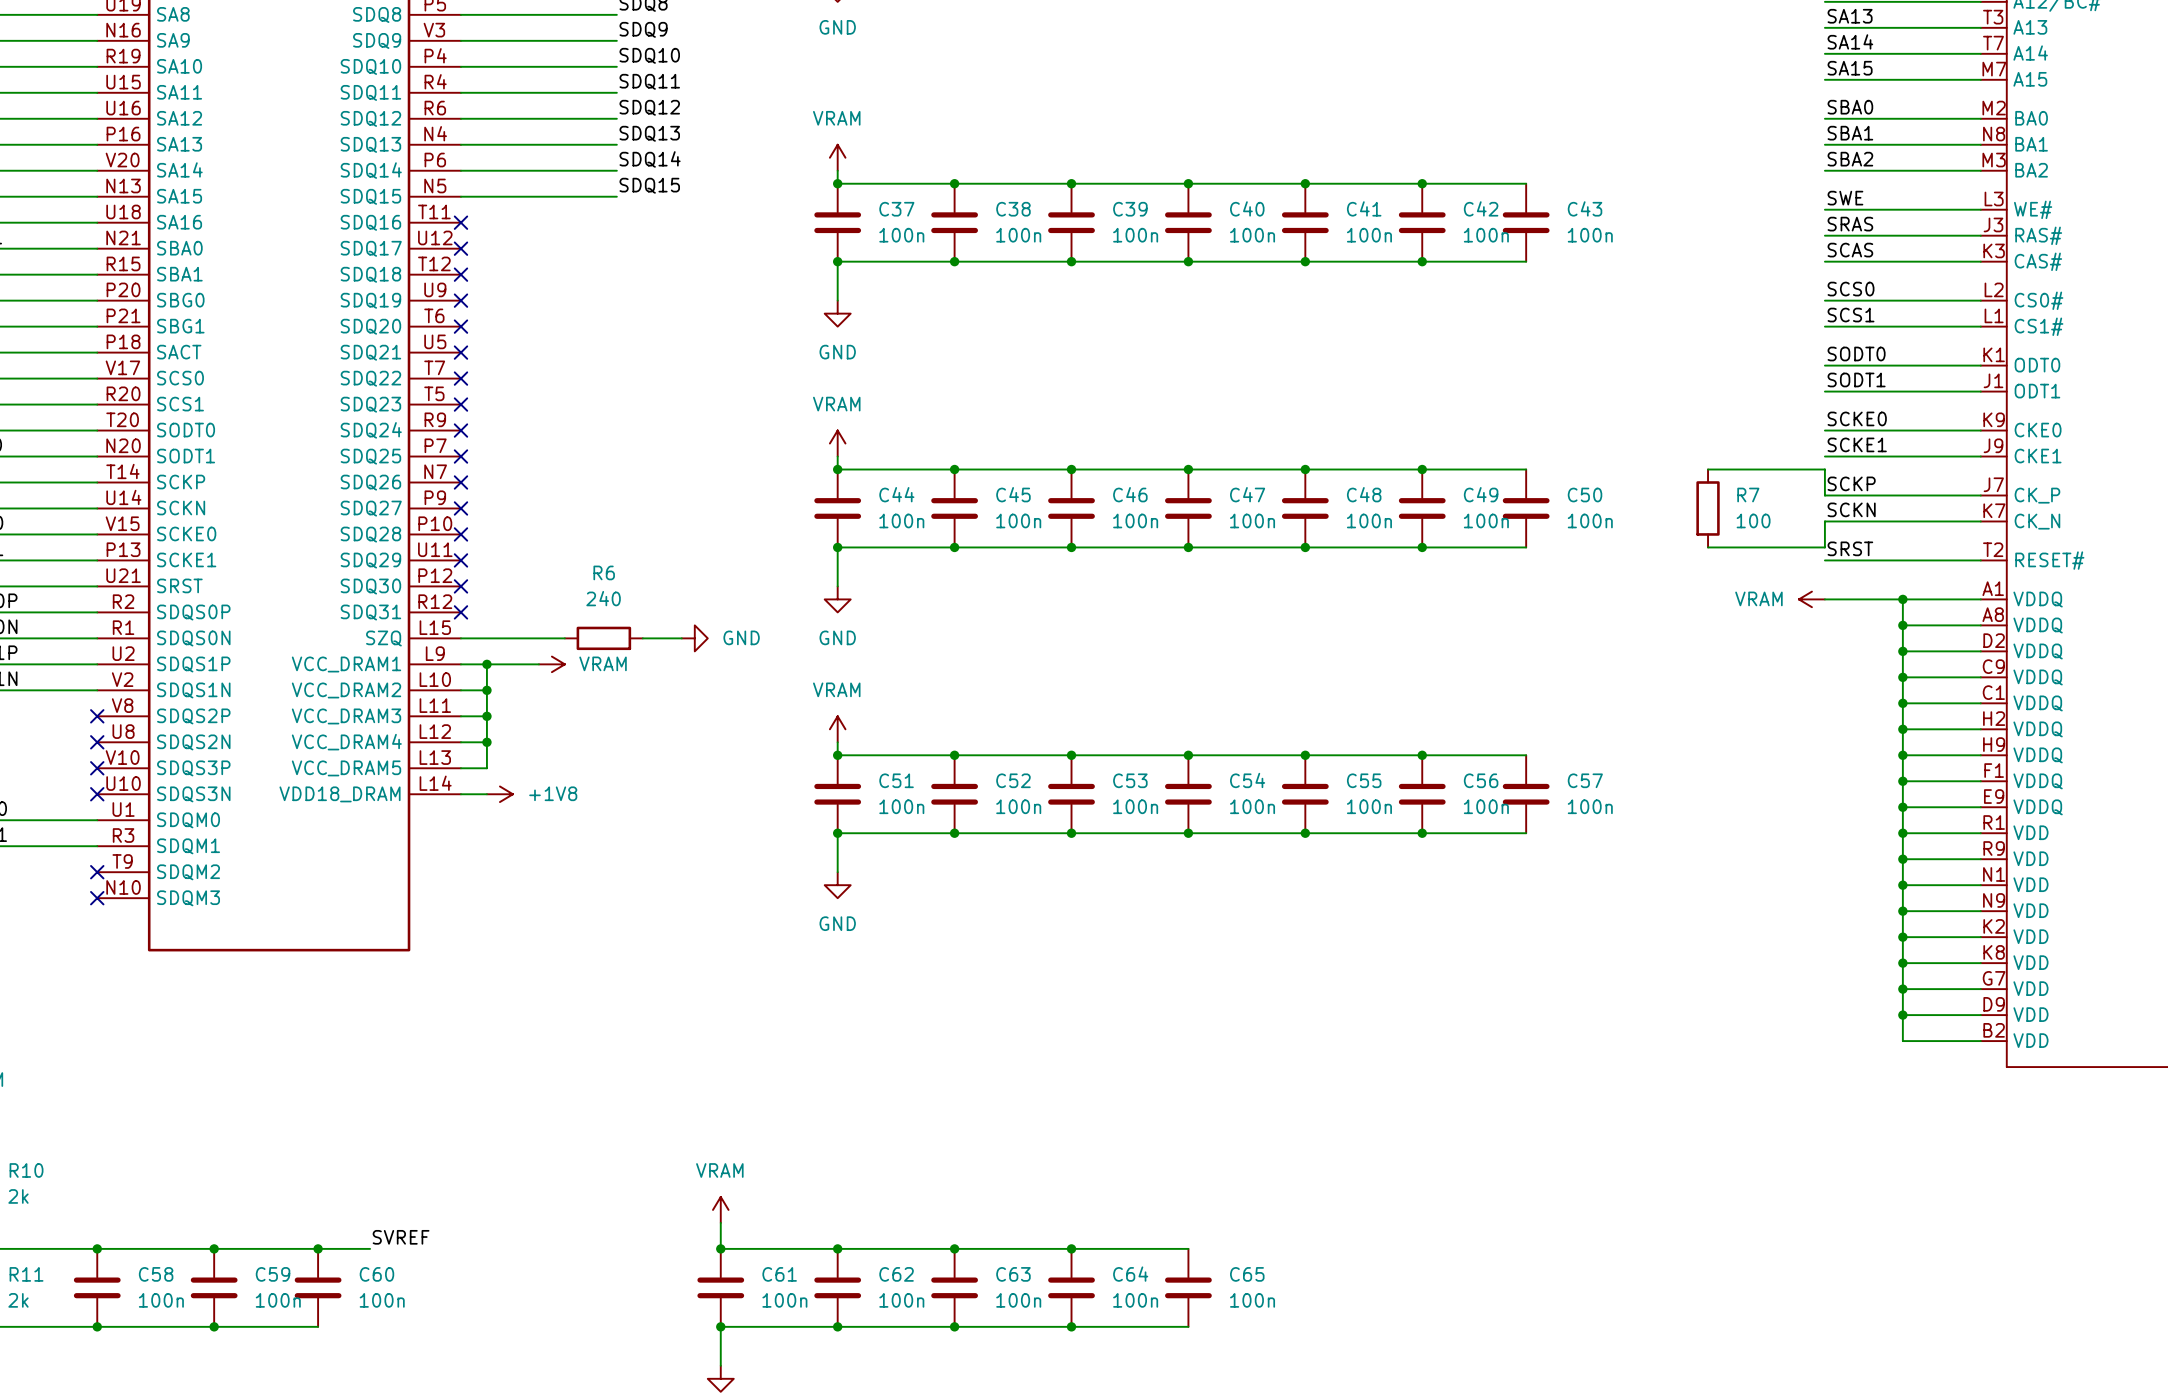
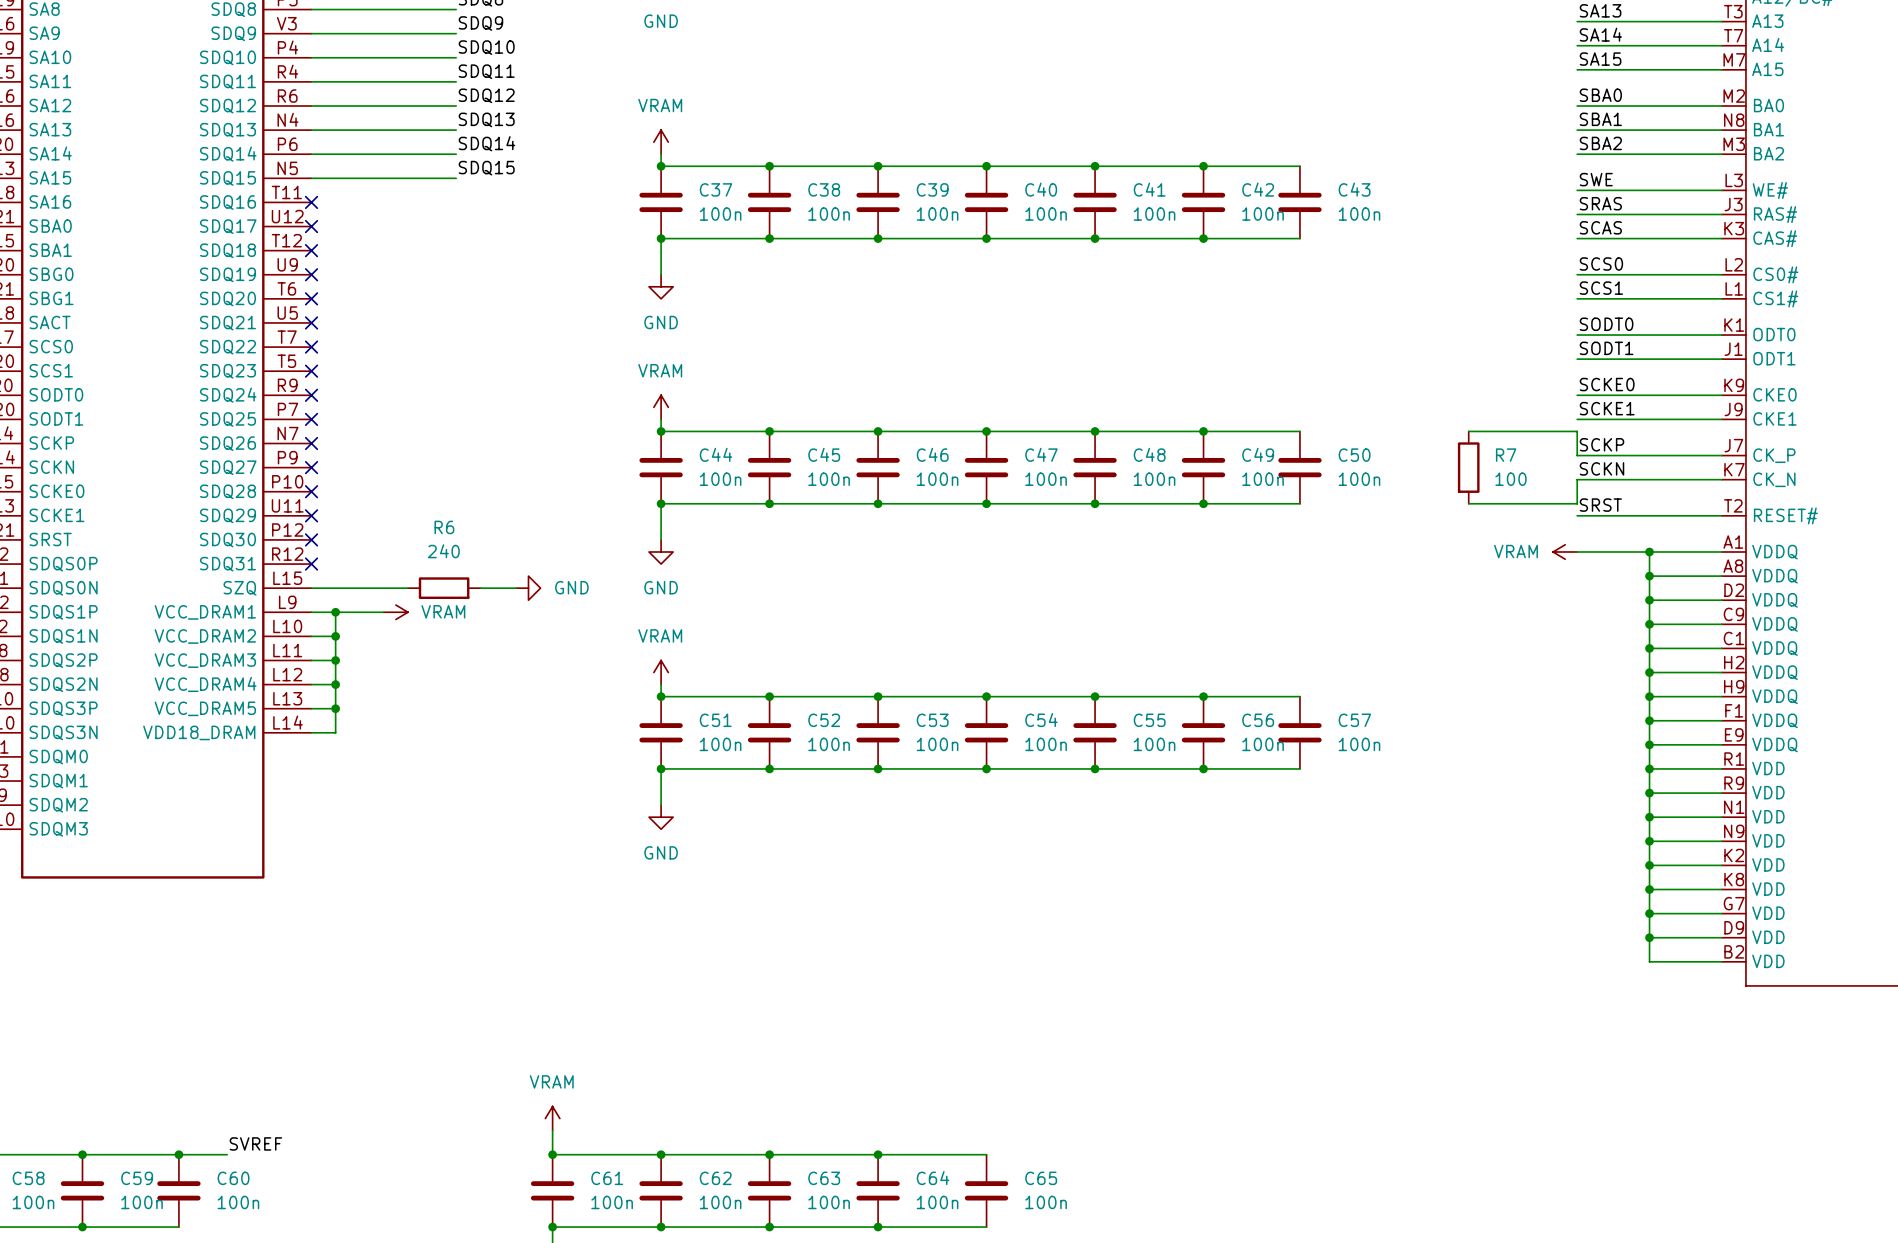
wire: none -> (335, 708) (335, 732)
junction: none -> (335, 708)
power symbol: +1V8 (499, 794) -> none

